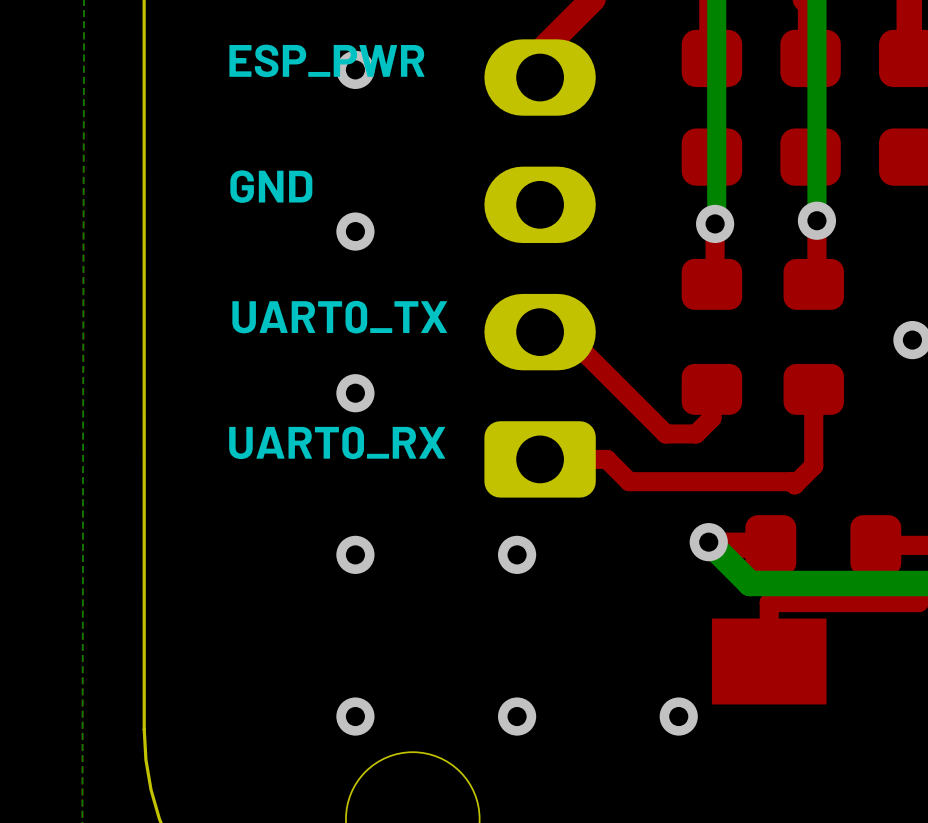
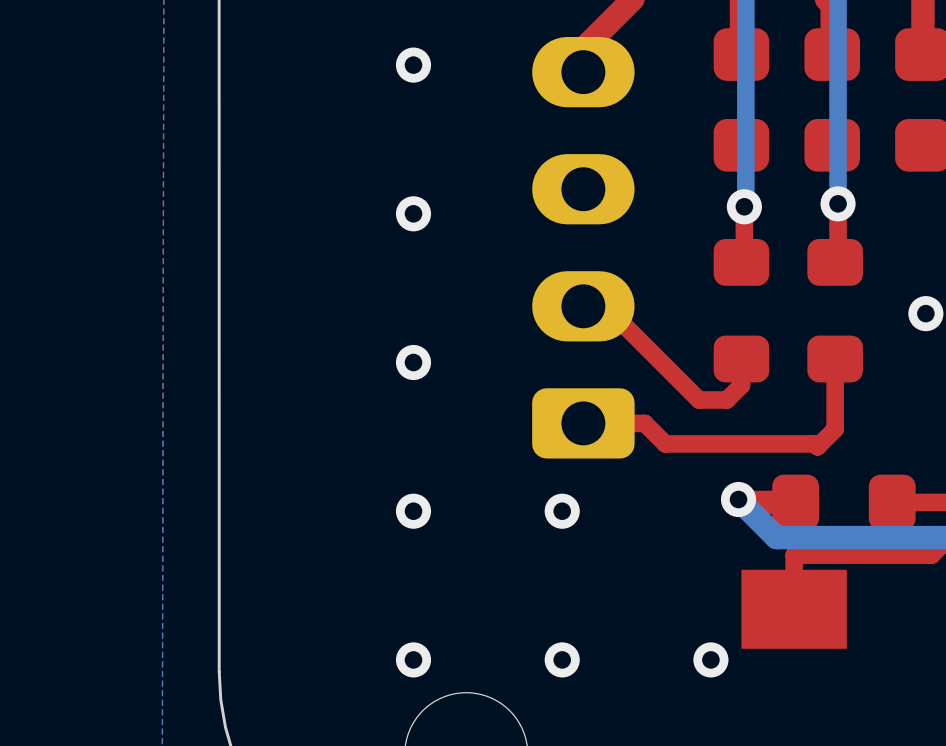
text: ESP_PWR (326, 60) -> none
text: GND (271, 186) -> none
text: UART0_TX (339, 317) -> none
text: UART0_RX (337, 442) -> none

